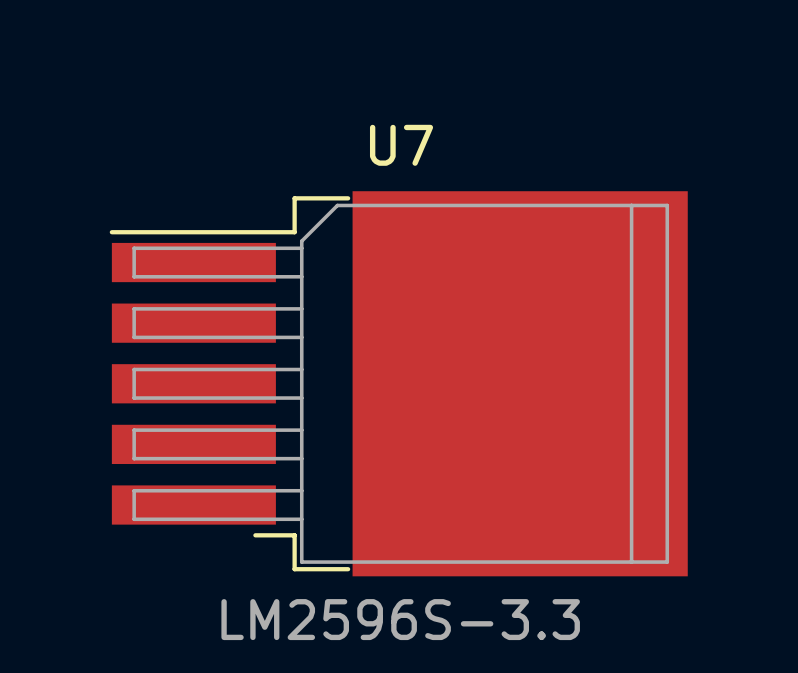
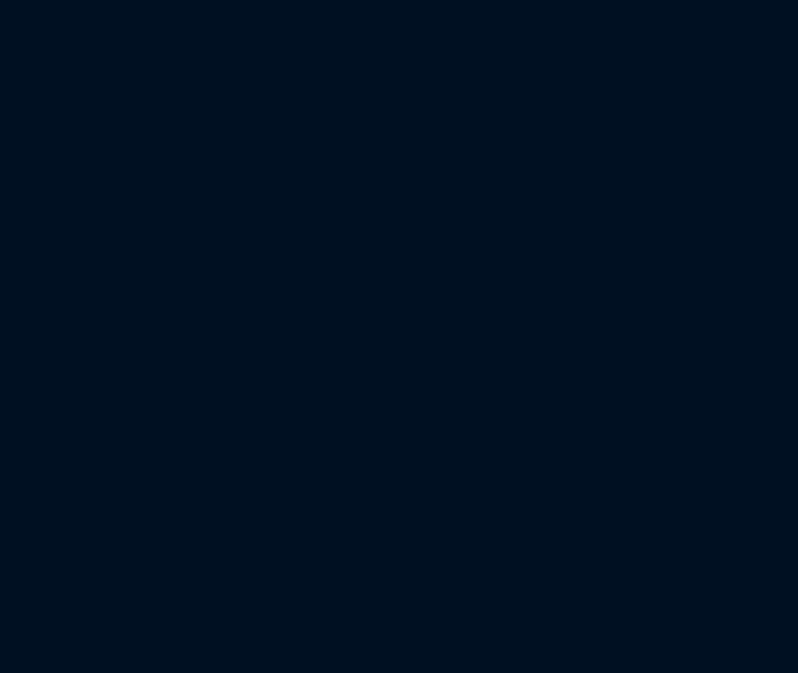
U7: LM2596S-3.3 (398, 383) -> none

